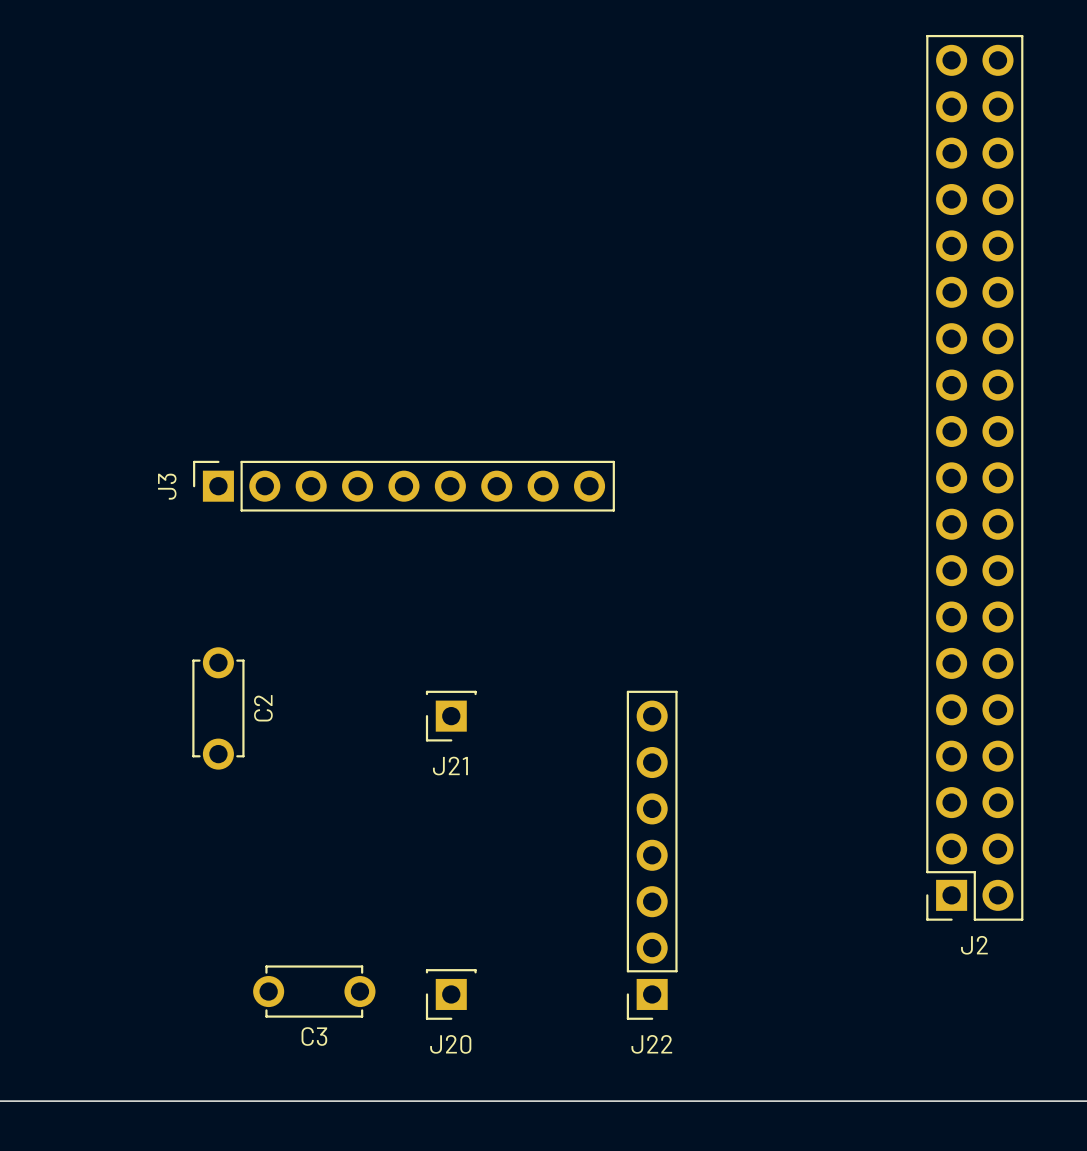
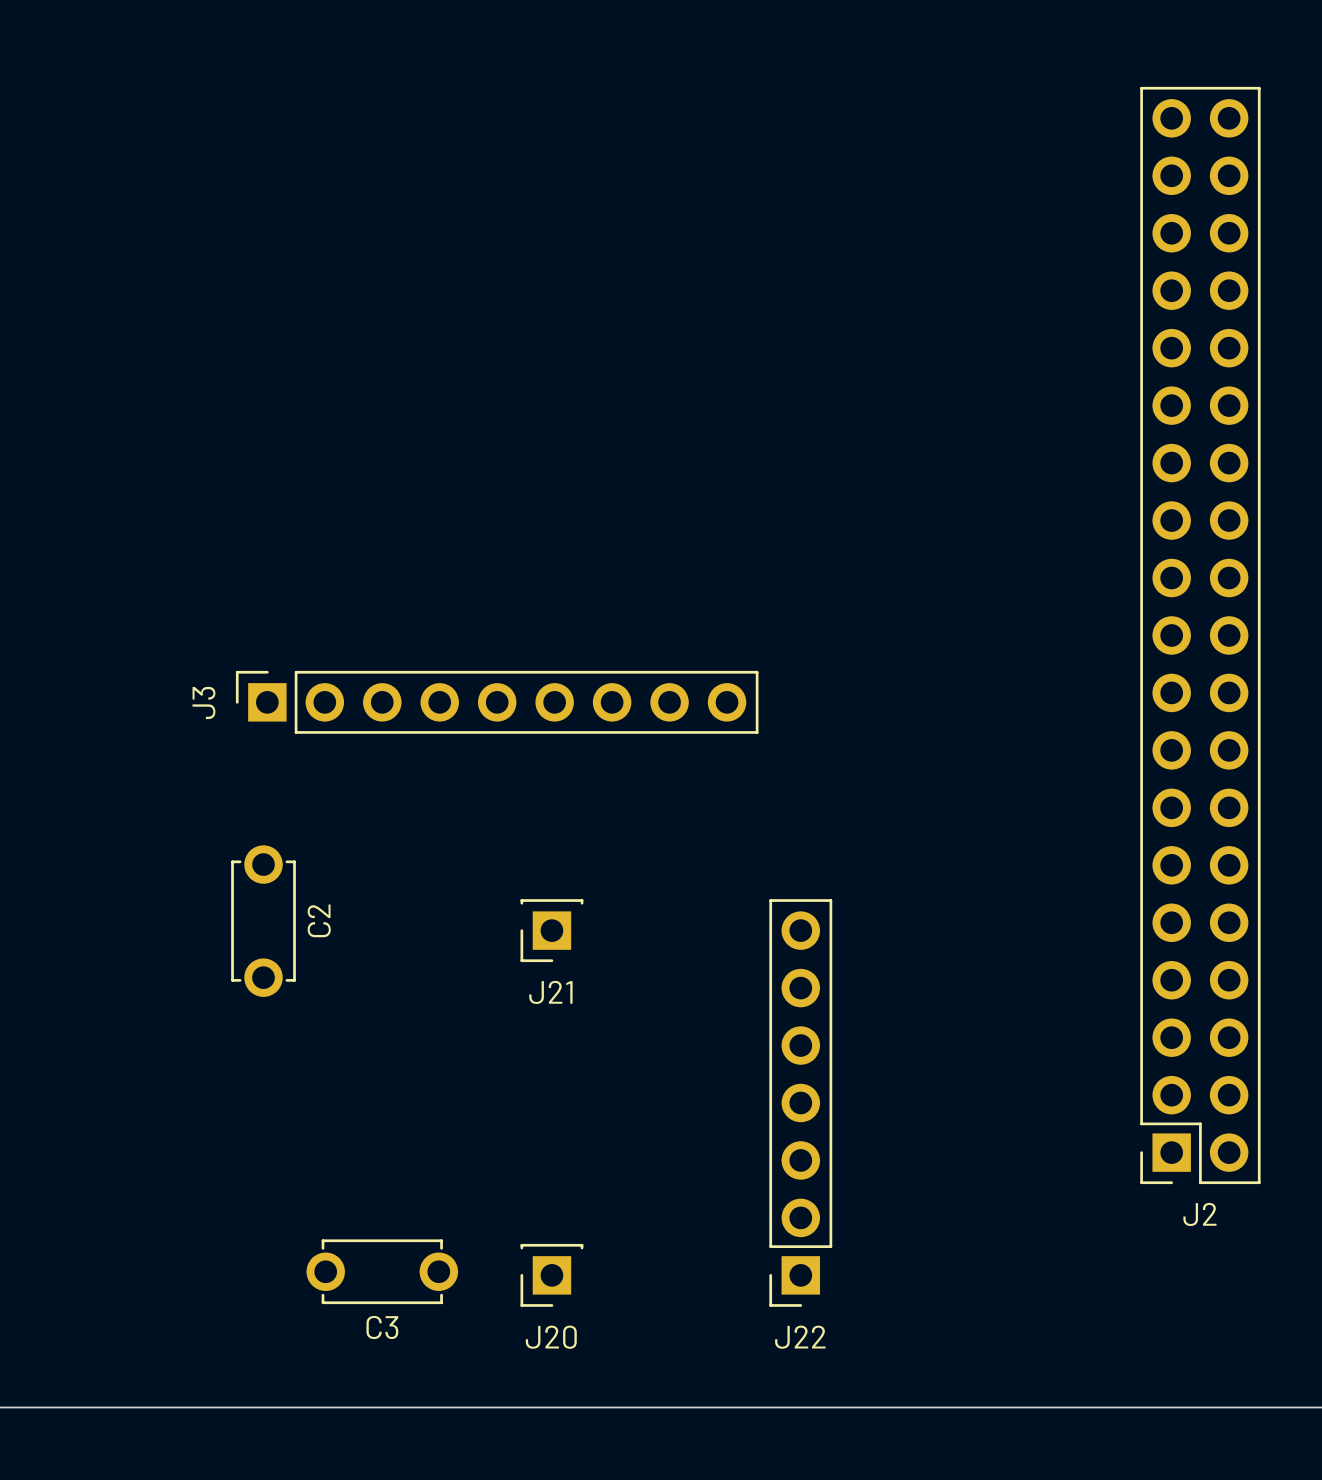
J3 position: (403, 486) -> (497, 702)

